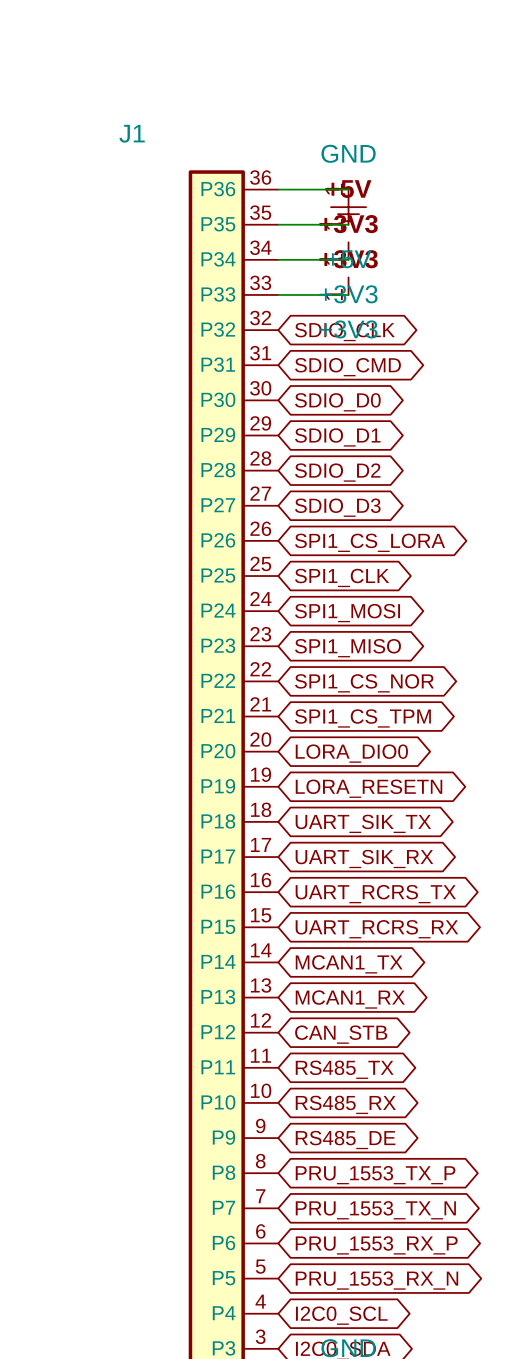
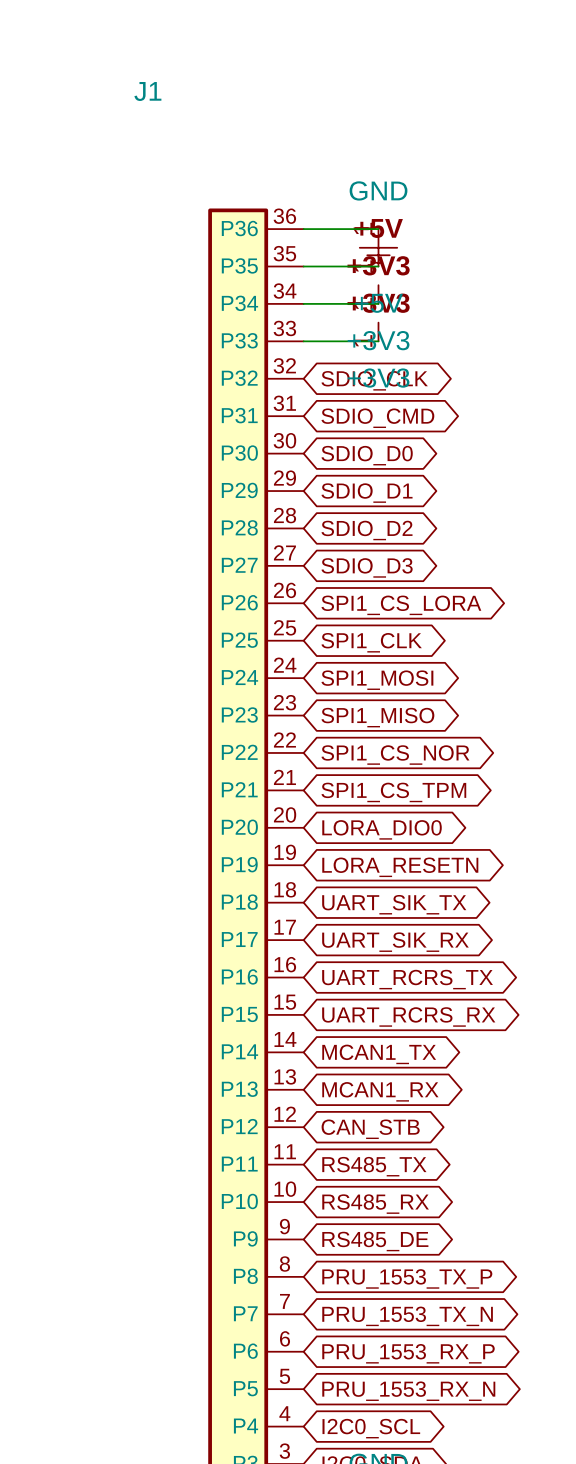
J1 name position: J1 (132, 133) -> J1 (147, 91)

